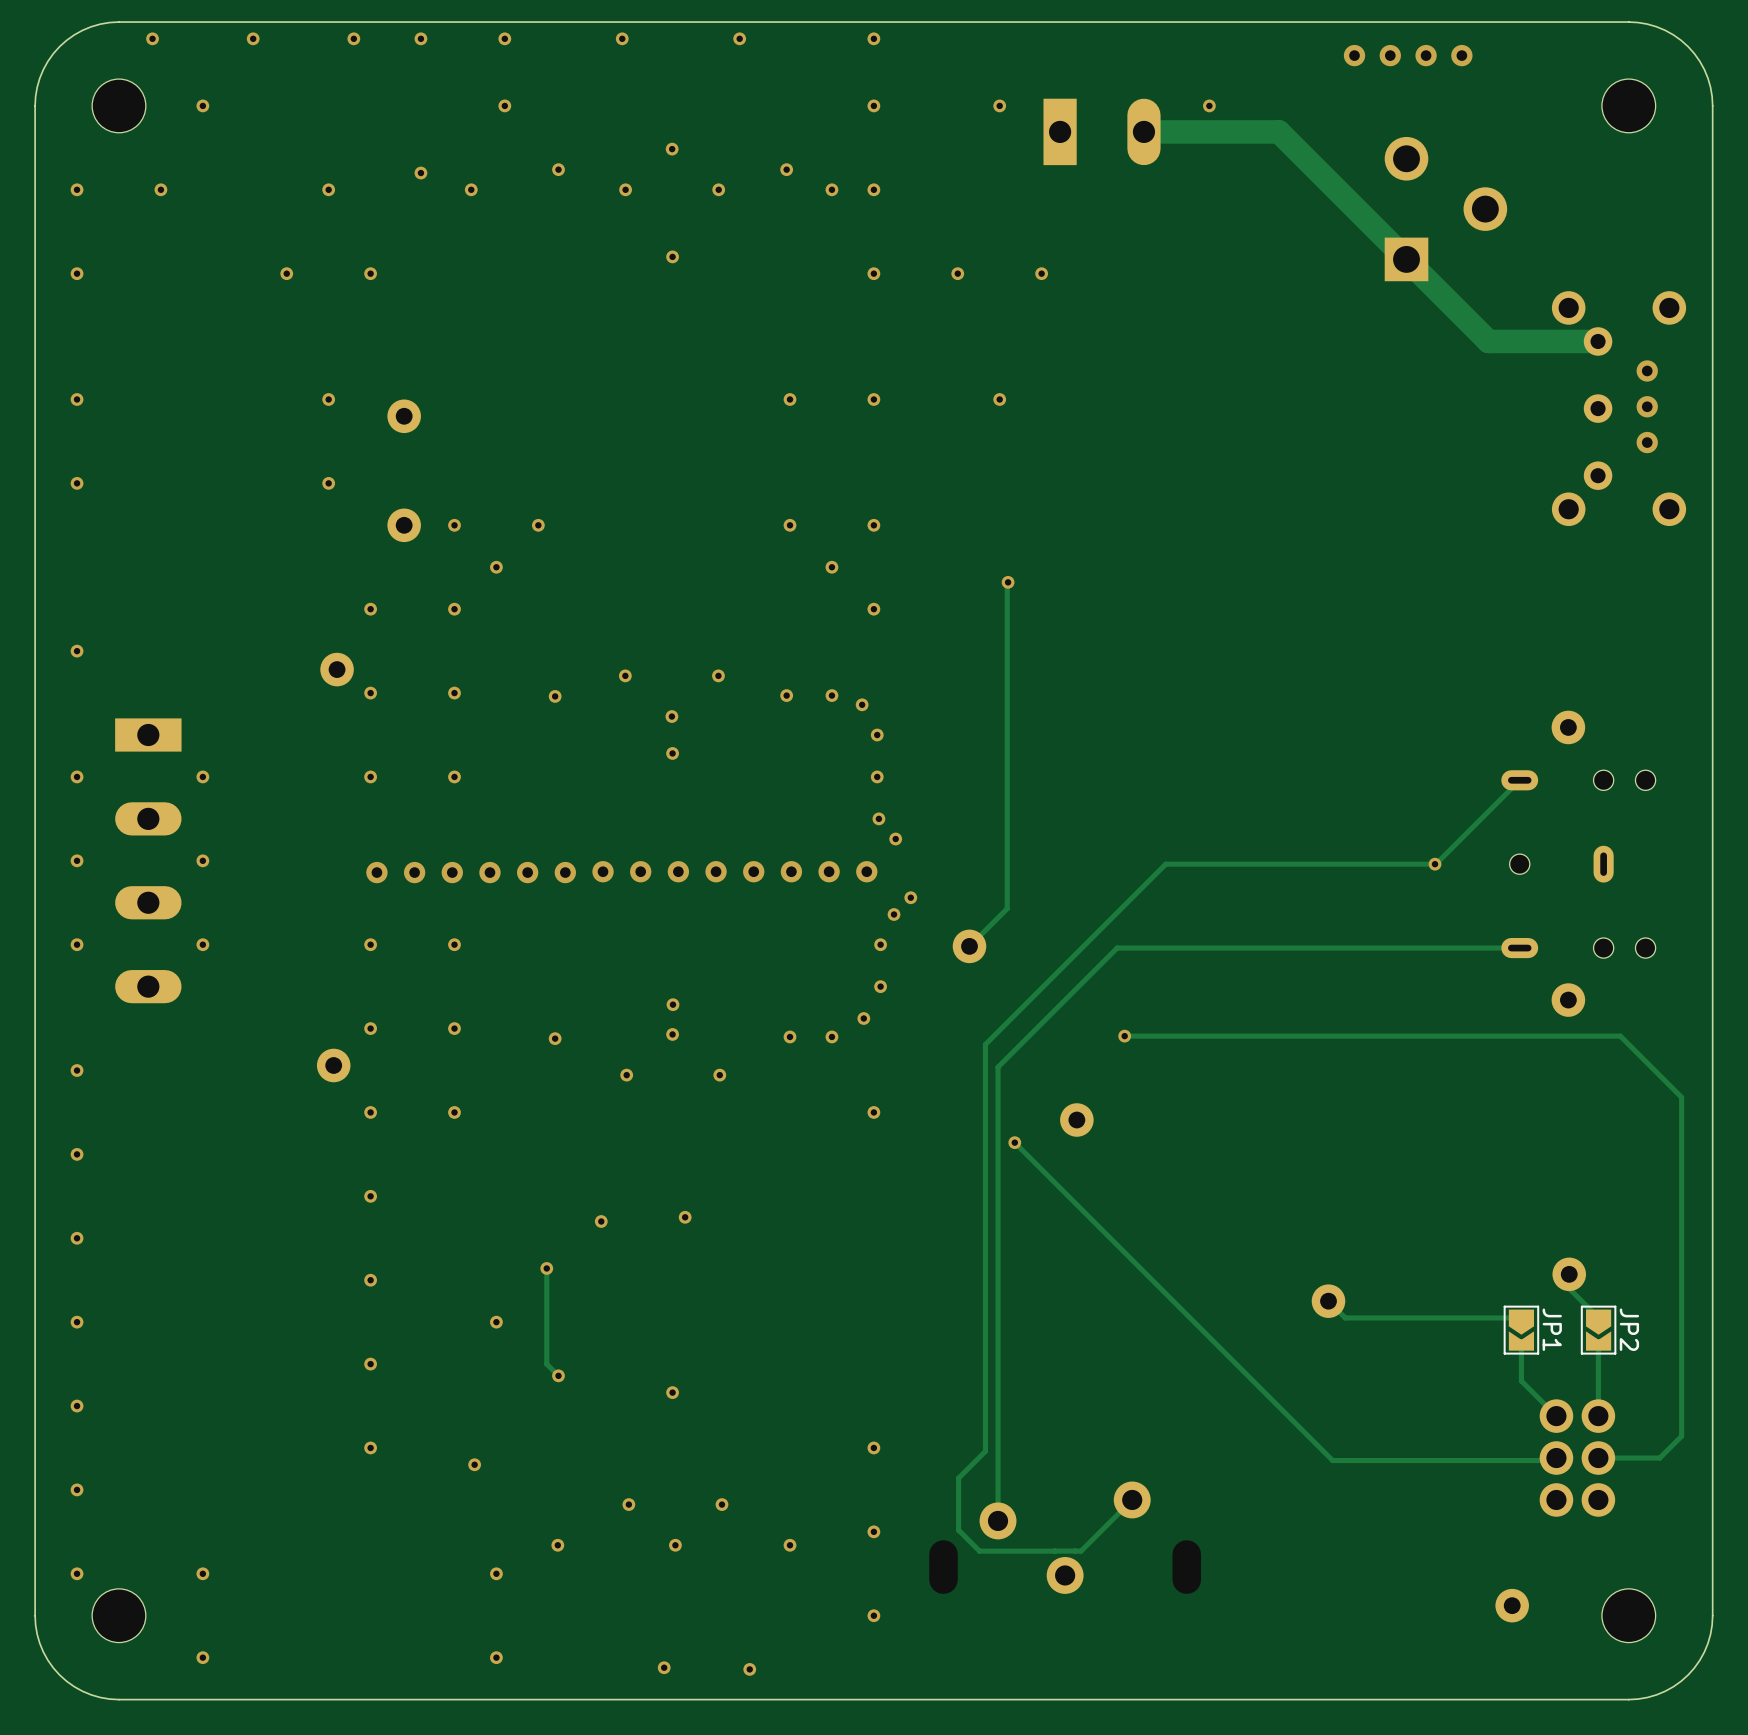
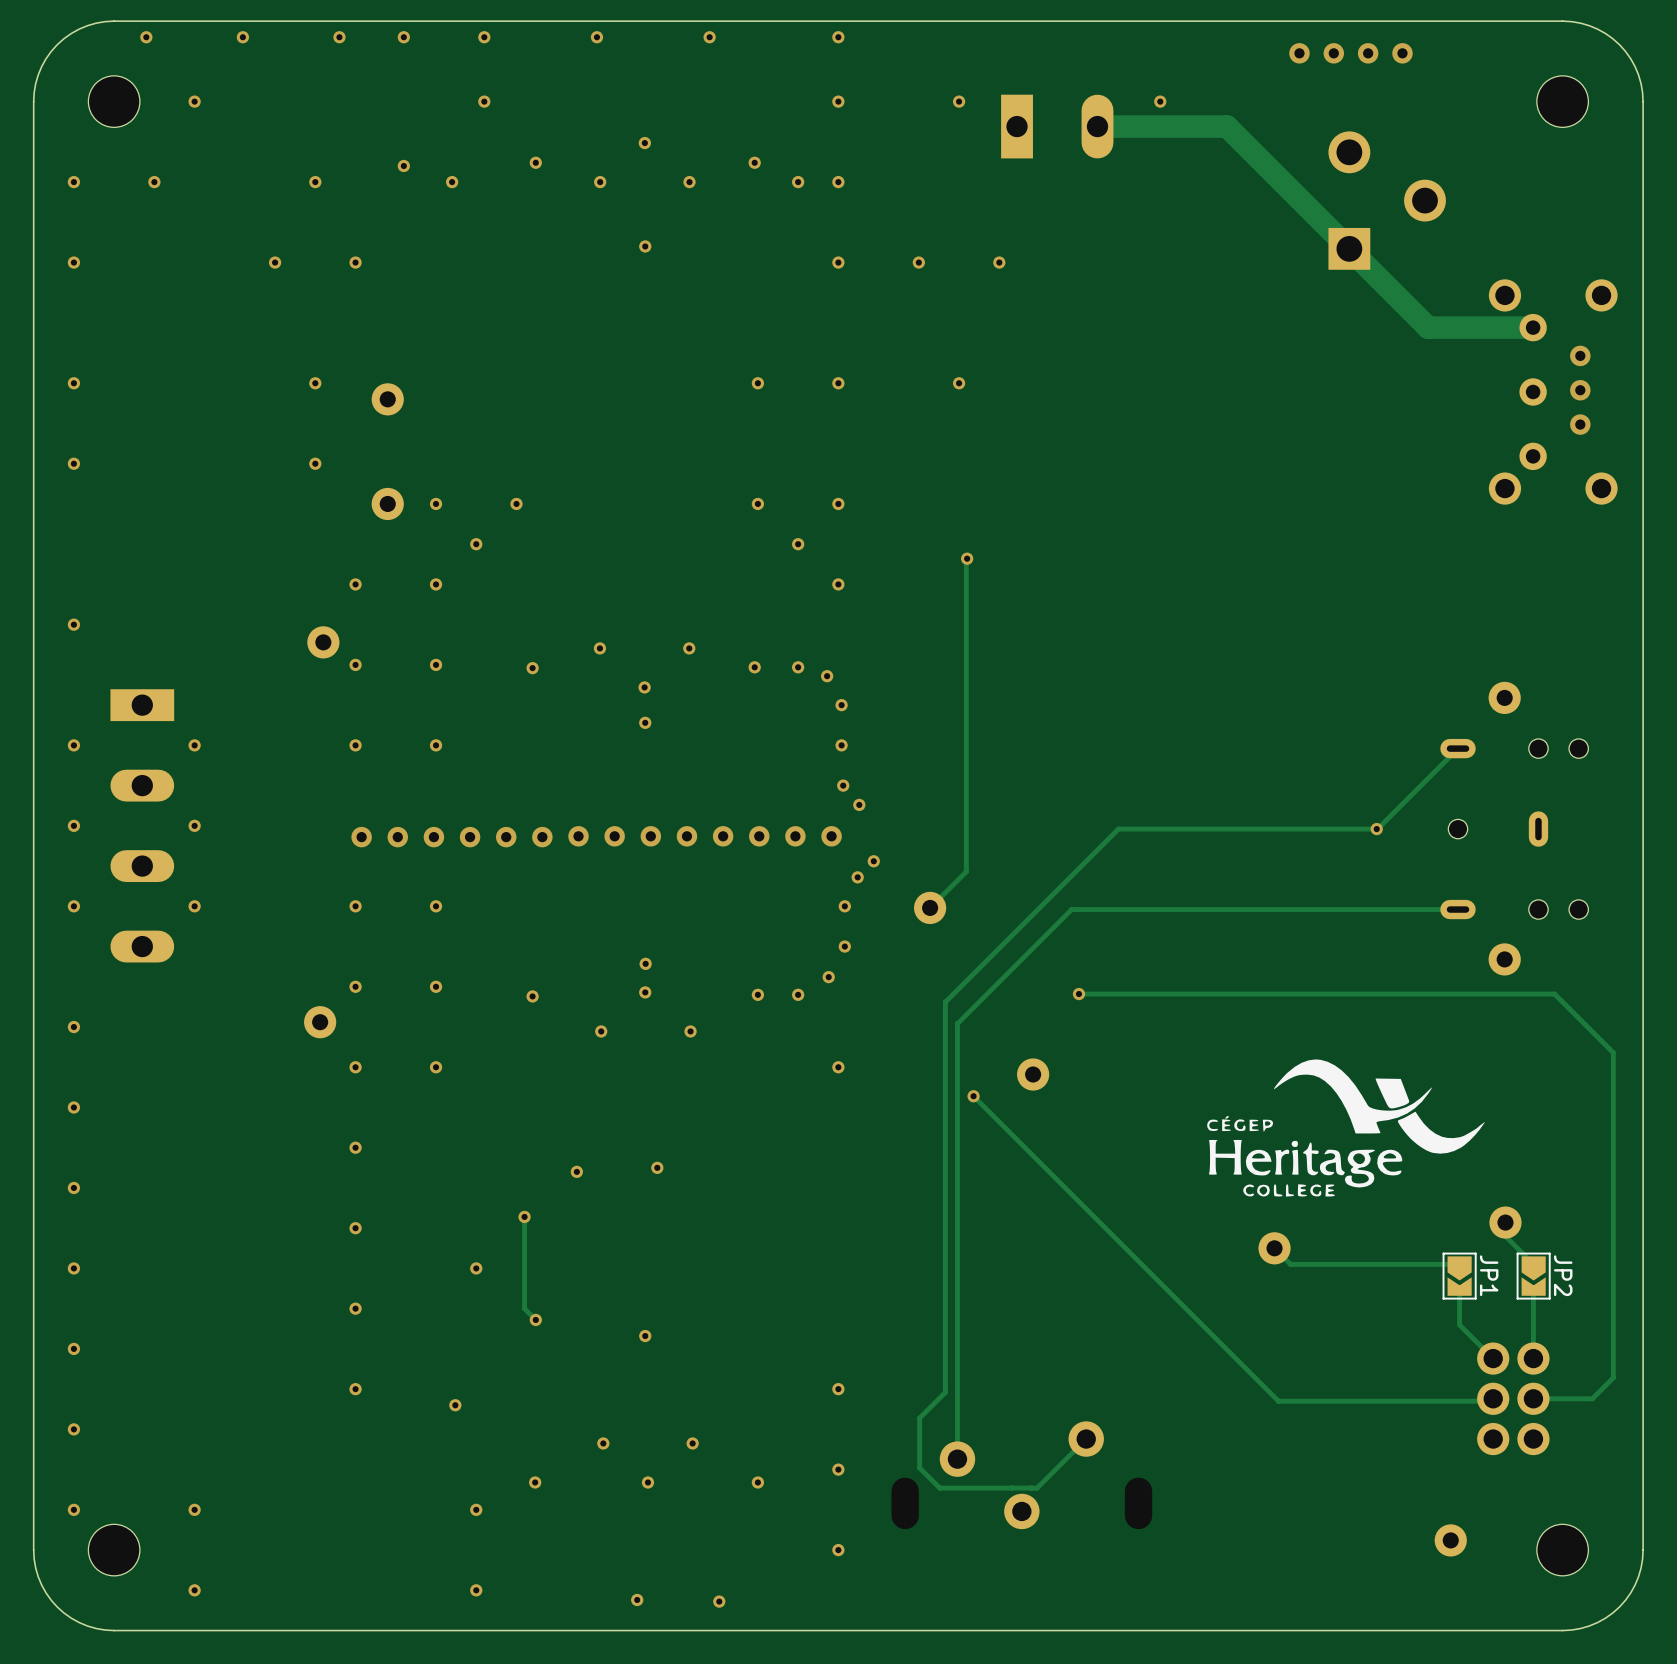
drawing: none -> [1207, 1059, 1486, 1197]

